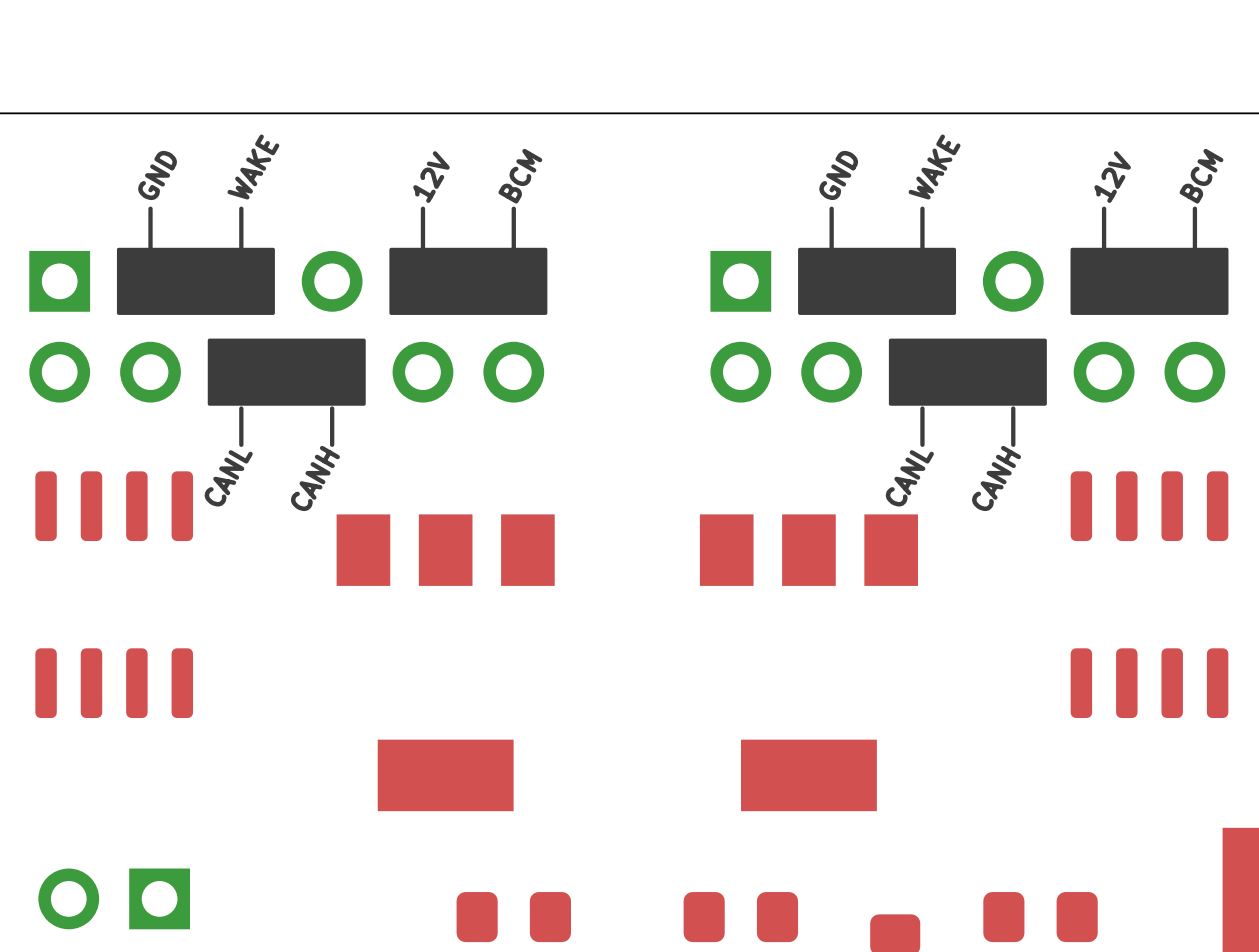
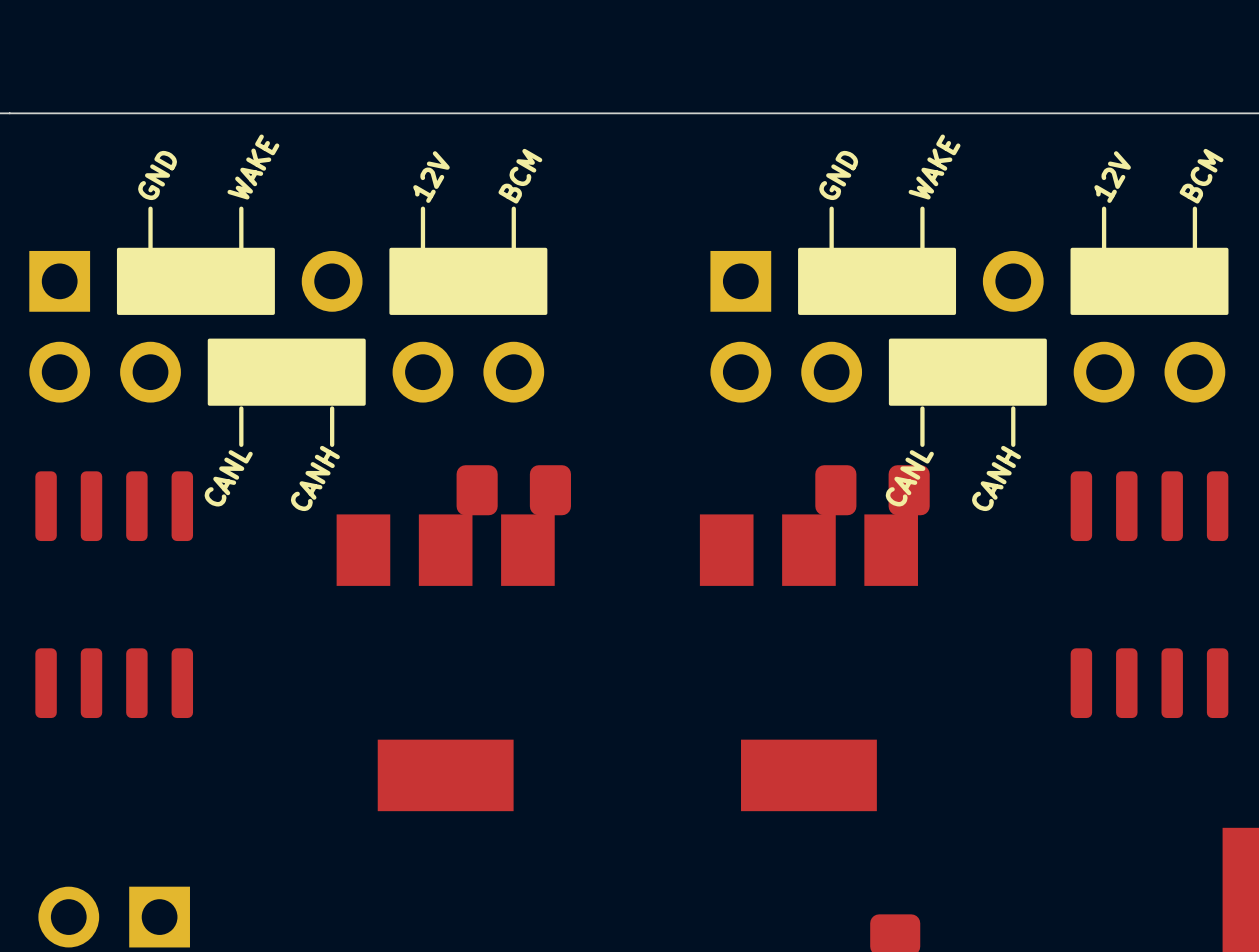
part: none -> (513, 490)
part: none -> (872, 490)
part position: (114, 898) -> (114, 917)
part: (513, 917) -> none
part: (740, 917) -> none
part: (1040, 917) -> none

